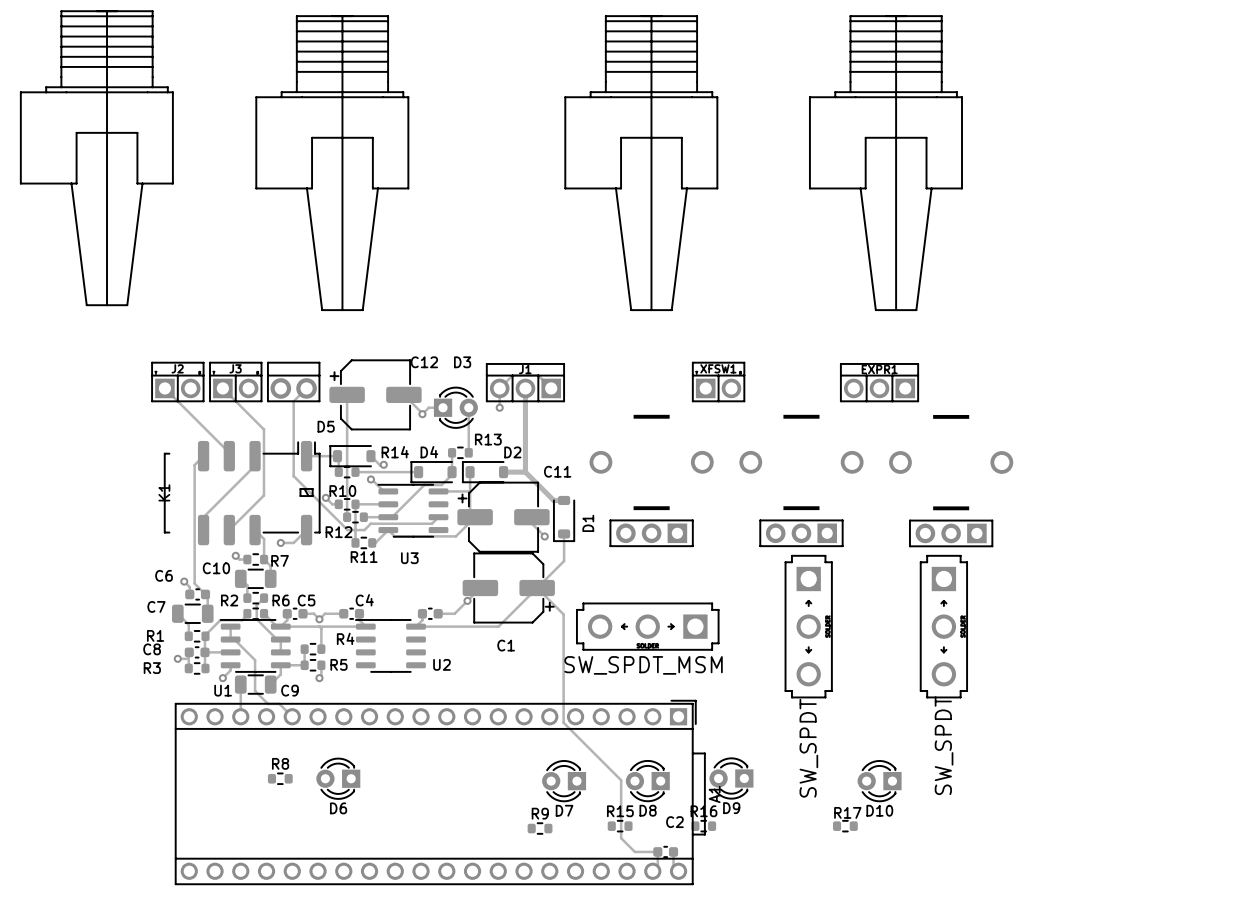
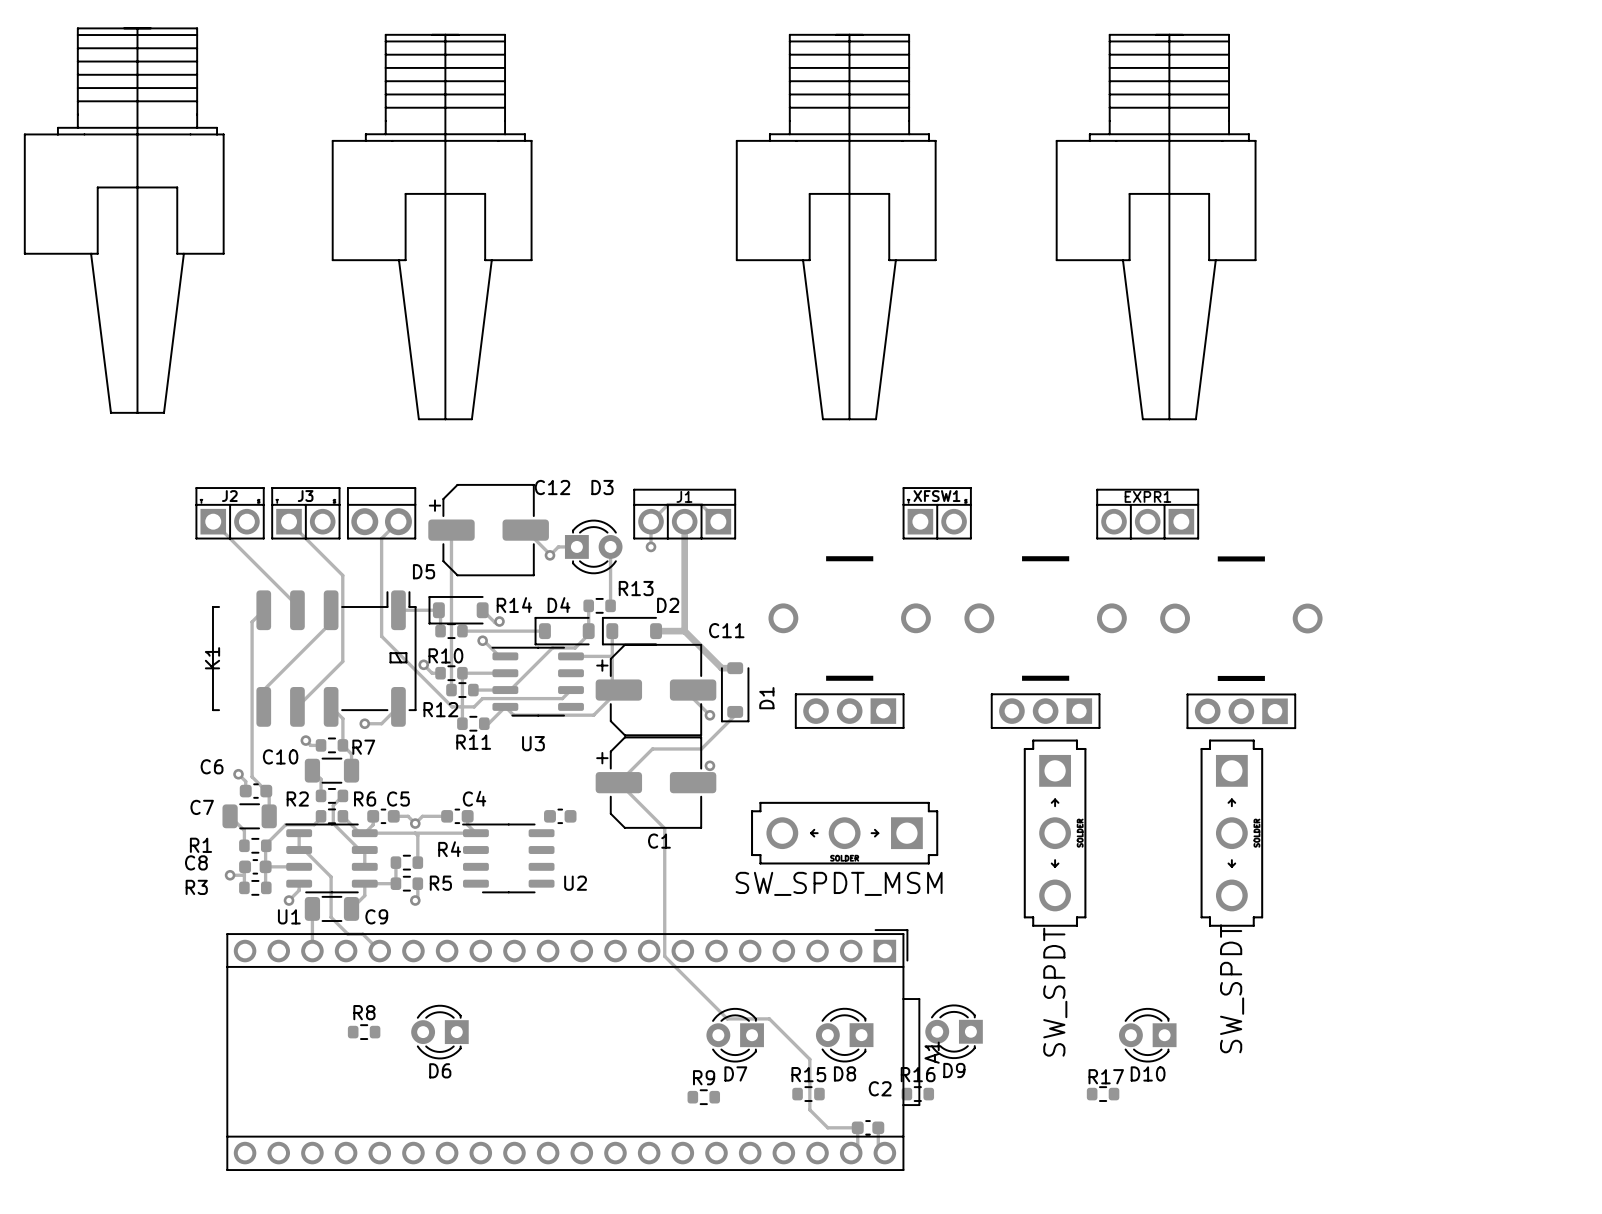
track: (564, 536) (564, 561) (498, 626) (416, 626) (422, 620) (422, 613) -> none
via: none -> (709, 765)
track: (480, 588) (454, 613) (438, 613) -> none
C1 rotation: 0° (508, 588) -> 180° (655, 782)
track: (537, 588) (563, 614) (563, 722) (621, 780) (621, 799) -> (735, 715) (701, 748) (652, 748) (618, 782) (664, 828) (664, 956) (727, 1018) (769, 1018) (809, 1059)
via: (467, 600) -> none

